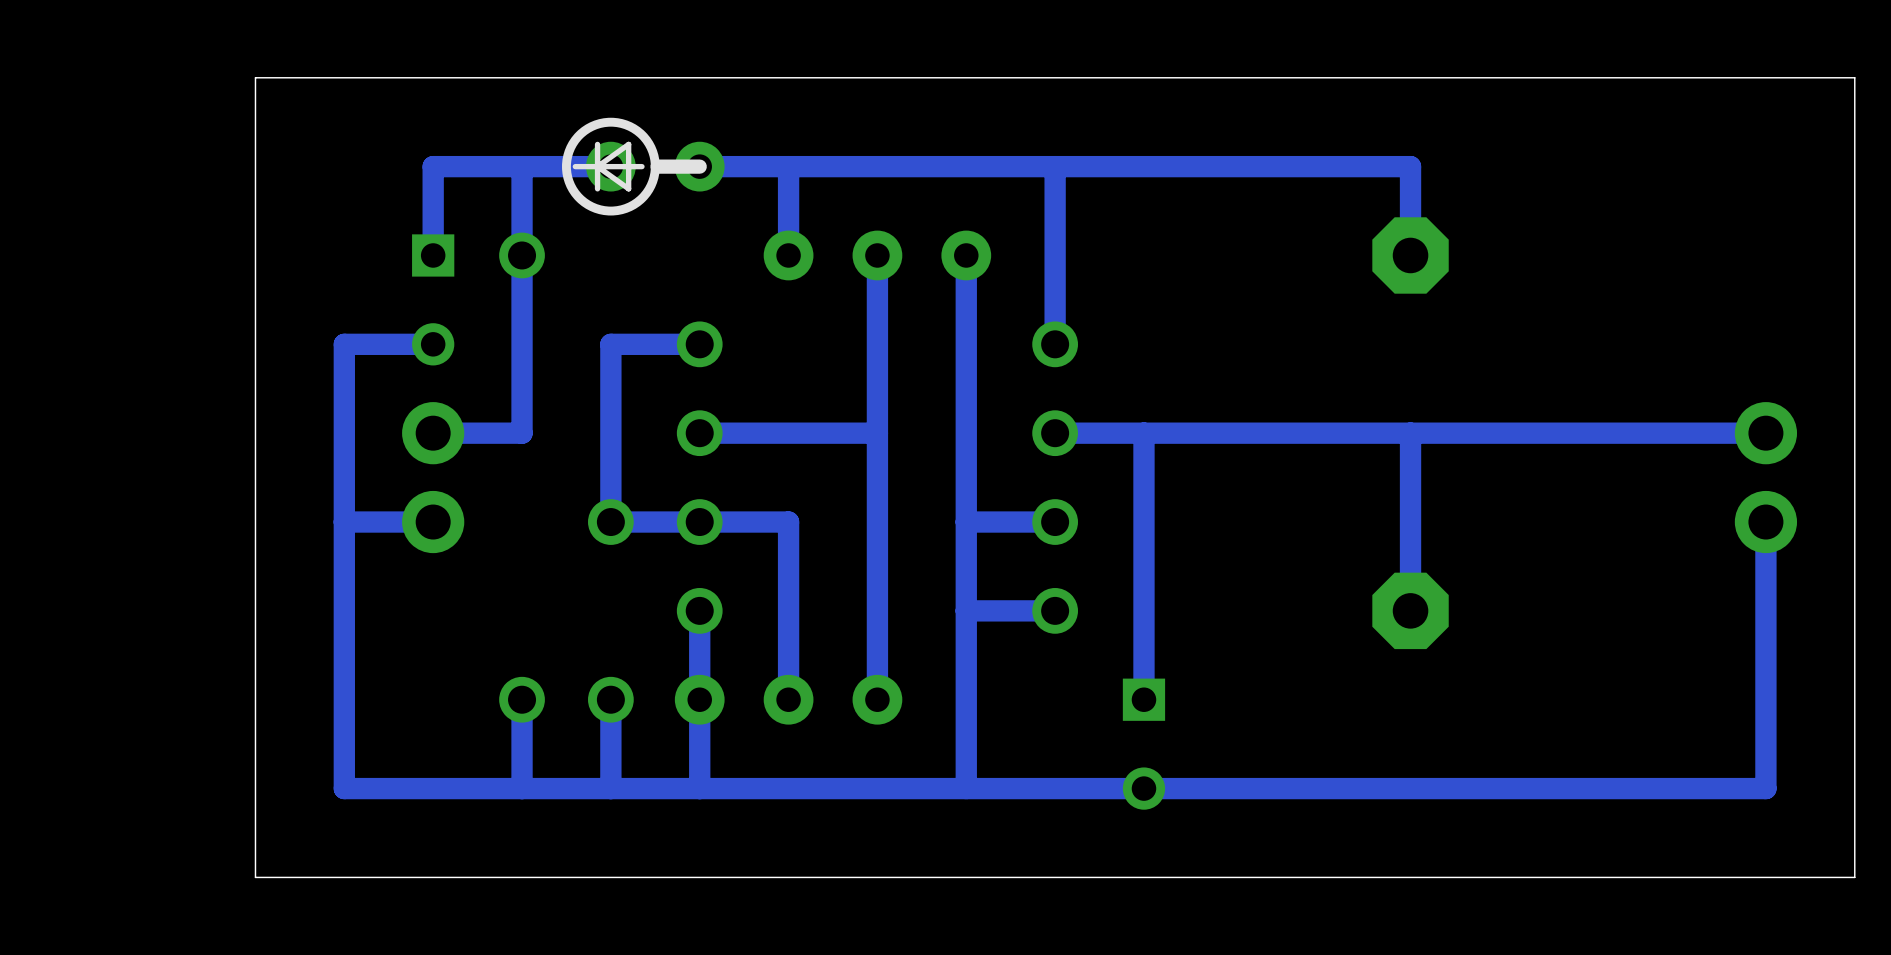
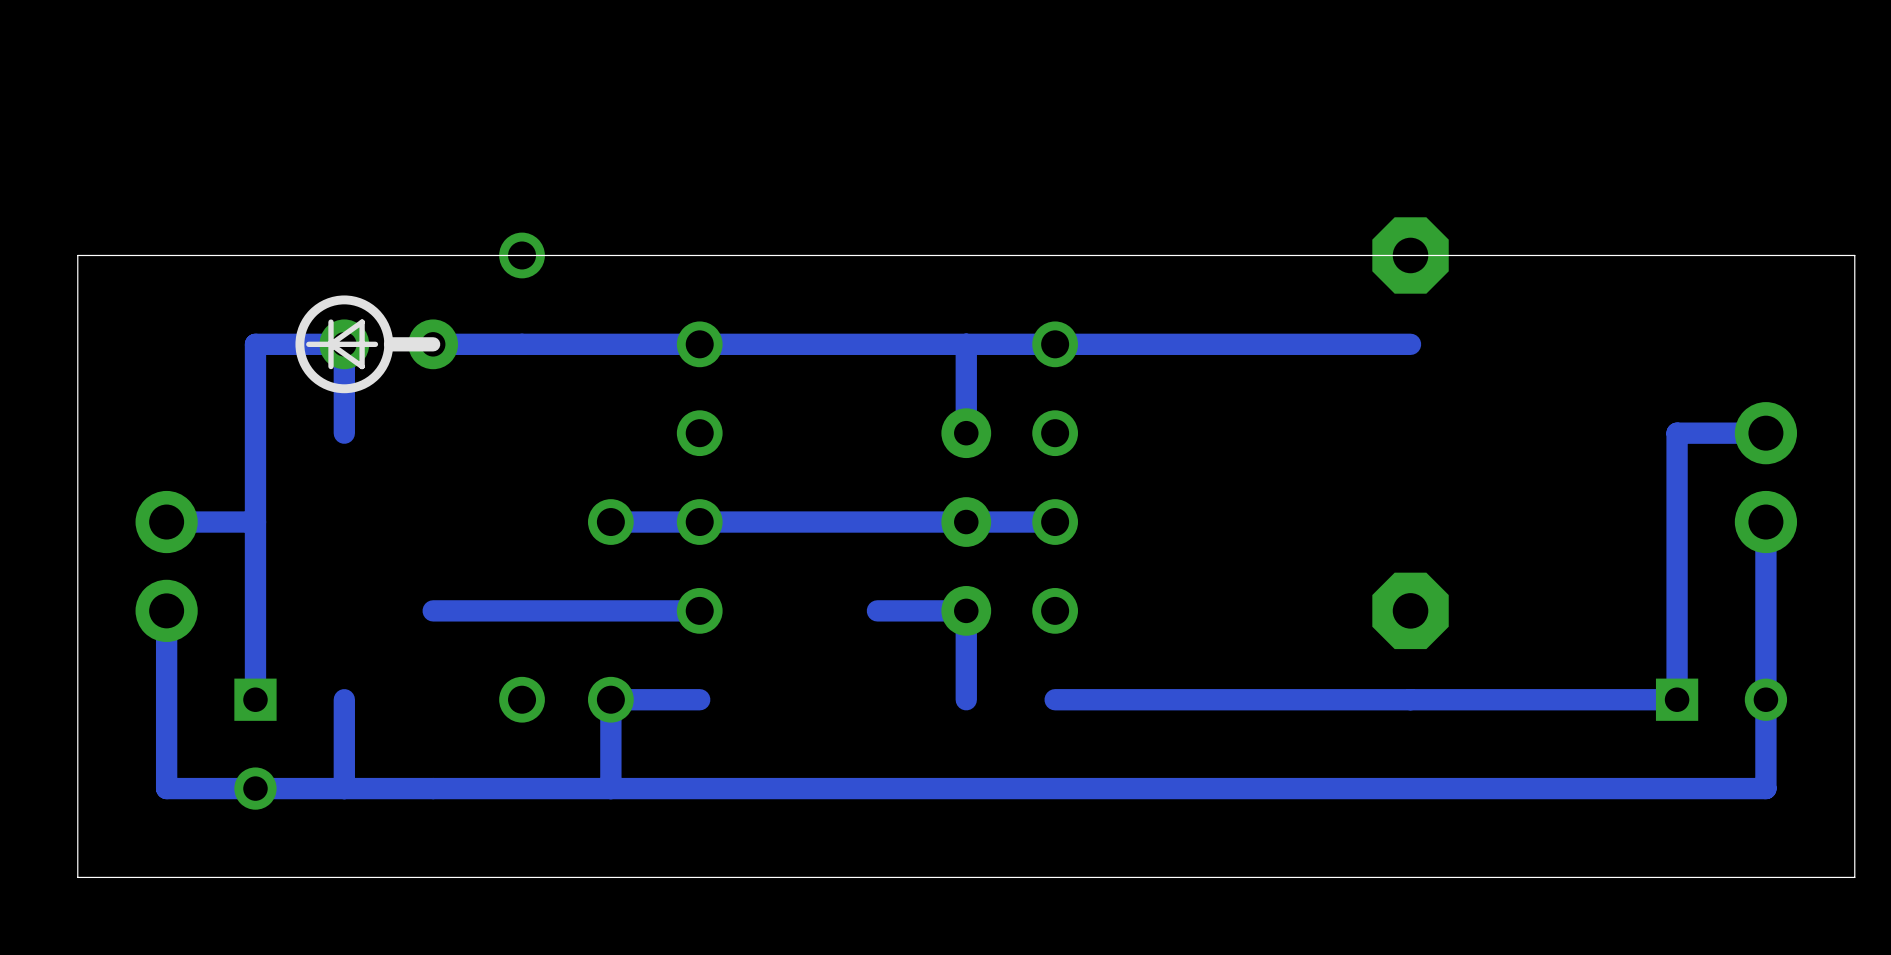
track: (522, 166) (522, 433) (433, 433) -> none
track: (610, 166) (433, 166) (433, 255) -> none
part position: (643, 166) -> (376, 344)
track: (699, 166) (1410, 166) (1410, 255) -> none
track: (788, 166) (788, 255) -> none
track: (1055, 166) (1055, 344) -> none
track: (877, 255) (877, 699) -> none
part: (877, 255) -> none
track: (966, 255) (966, 344) -> none
board edge: (1854, 255) (1854, 77) (255, 77) (255, 877) -> (1854, 255) (77, 255) (77, 877) (255, 877)
part: (433, 299) -> none
track: (433, 344) (344, 344) -> (255, 699) (255, 344) (344, 344)
track: (610, 344) (610, 522) -> (610, 344) (433, 344)
track: none -> (1410, 344) (699, 344)
track: (344, 433) (344, 699) -> none
track: (877, 433) (699, 433) -> none
track: (966, 433) (966, 610) (1055, 610) -> none
track: (1143, 433) (1143, 699) -> none
track: (1410, 433) (1410, 610) -> none
track: (1677, 433) (1055, 433) -> (1677, 433) (1677, 699) (1055, 699)
part position: (433, 477) -> (166, 566)
track: (433, 522) (344, 522) -> (255, 522) (166, 522)
track: (788, 522) (788, 699) -> (788, 522) (966, 522)
part: none -> (966, 522)
track: none -> (166, 610) (166, 788) (344, 788)
track: (699, 610) (699, 788) -> (699, 610) (433, 610)
track: none -> (966, 610) (877, 610)
track: (522, 699) (522, 788) -> none
track: none -> (699, 699) (610, 699)
part: (788, 699) -> none
track: (966, 699) (966, 788) -> none
part: none -> (1721, 699)
part: none -> (255, 744)
part: (1143, 744) -> none

